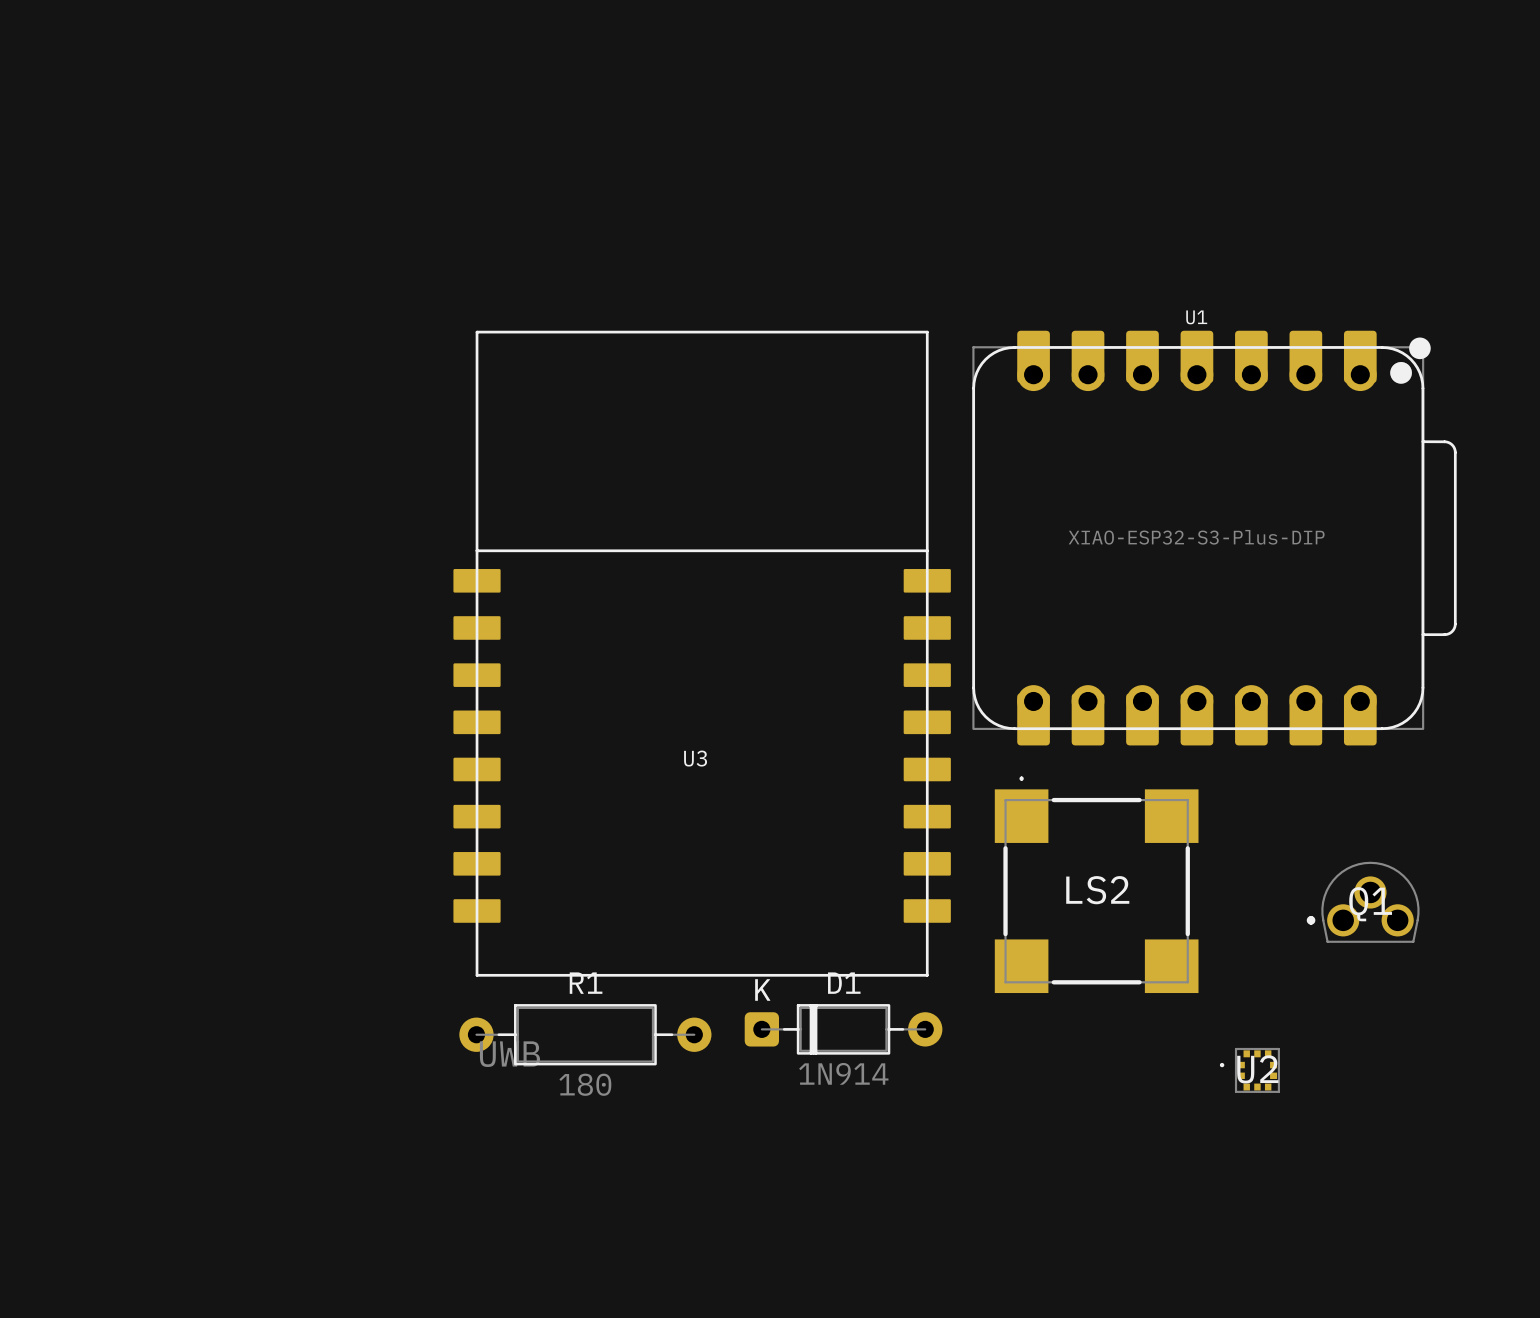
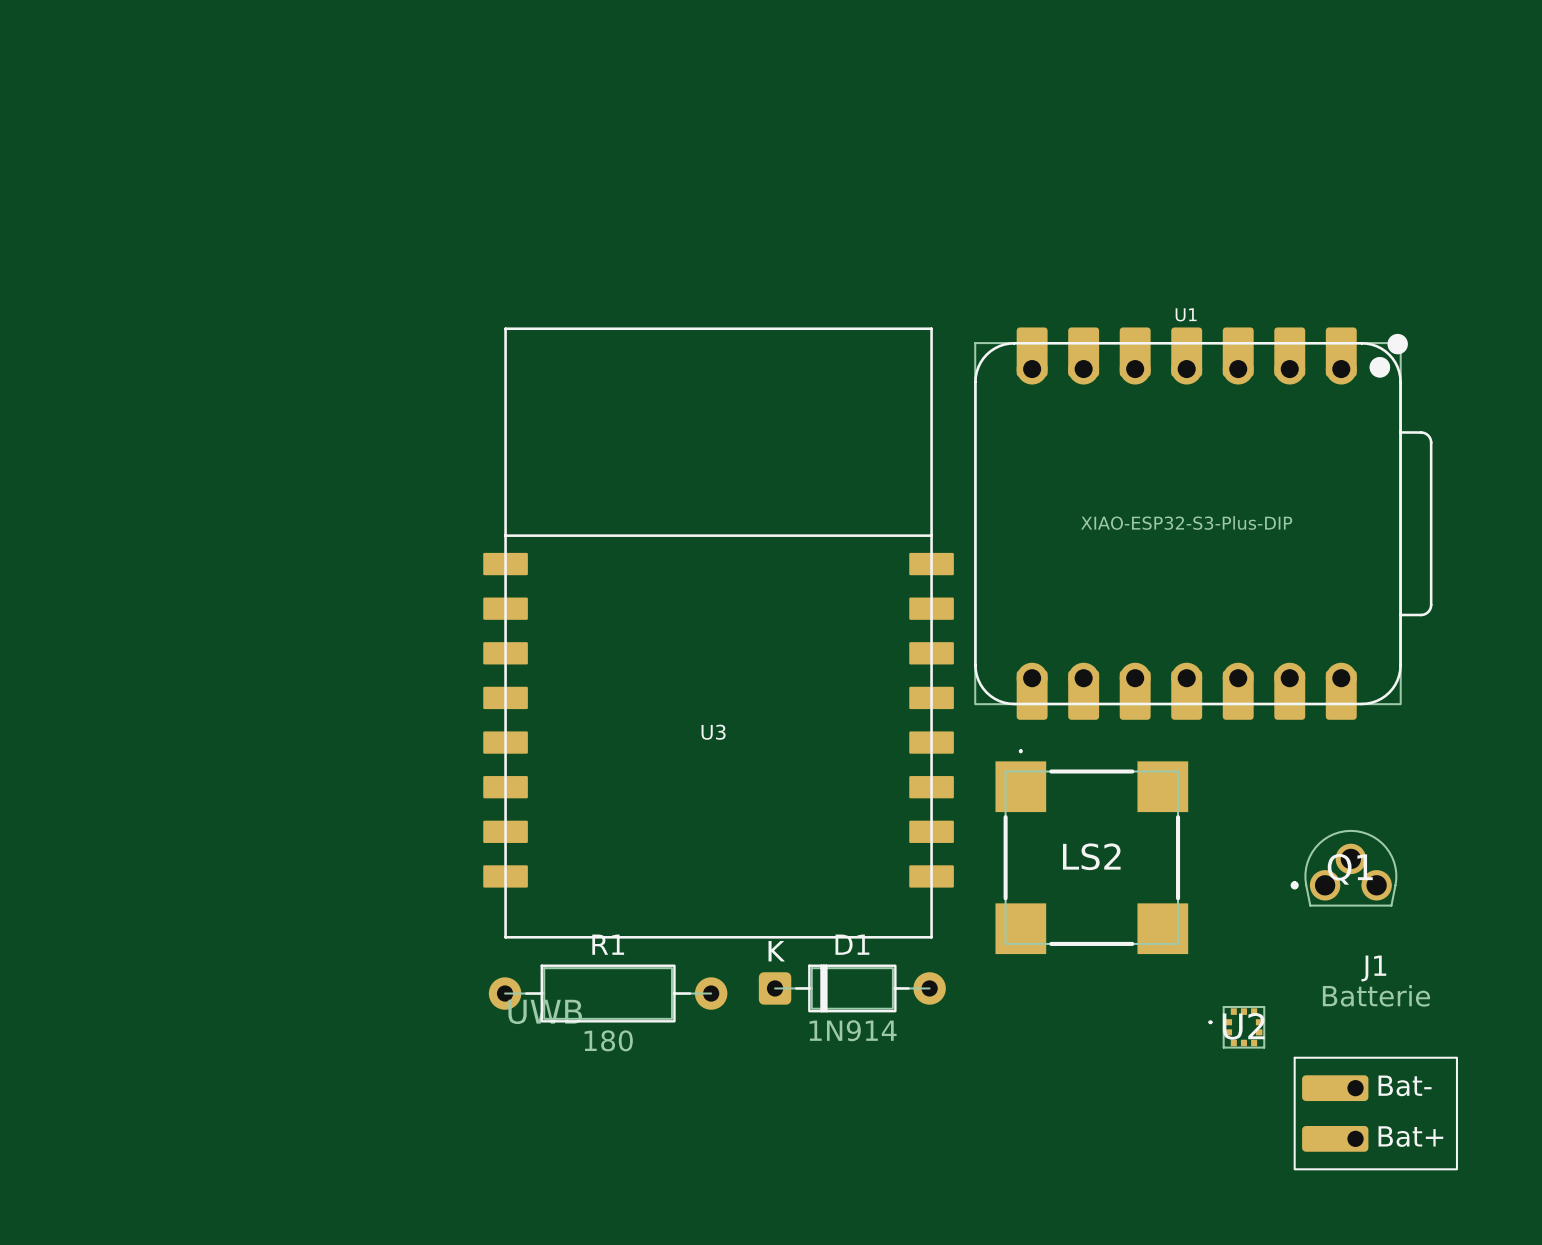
J1: none -> Batterie (1375, 1113)

